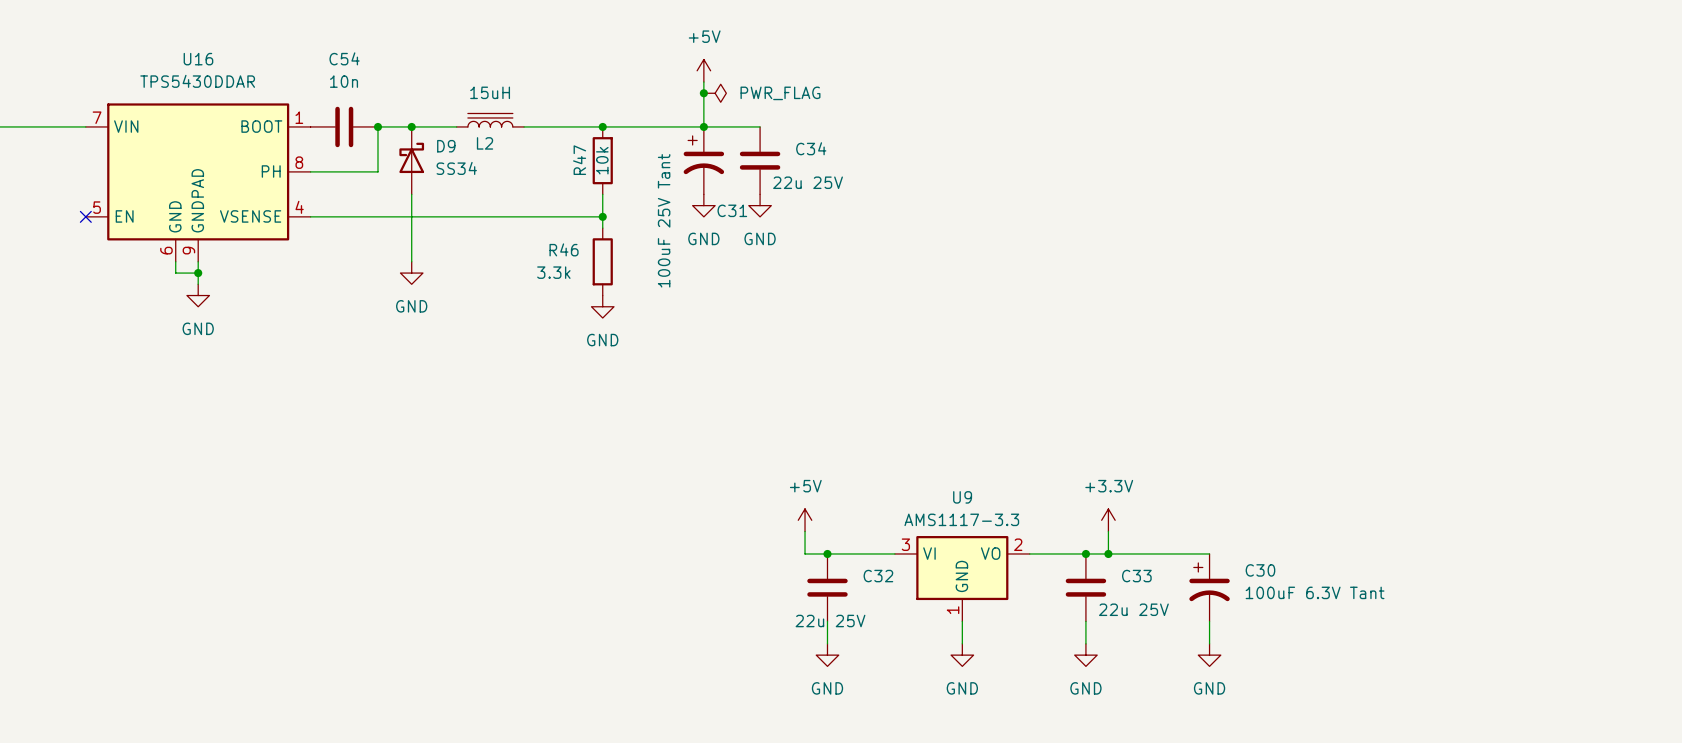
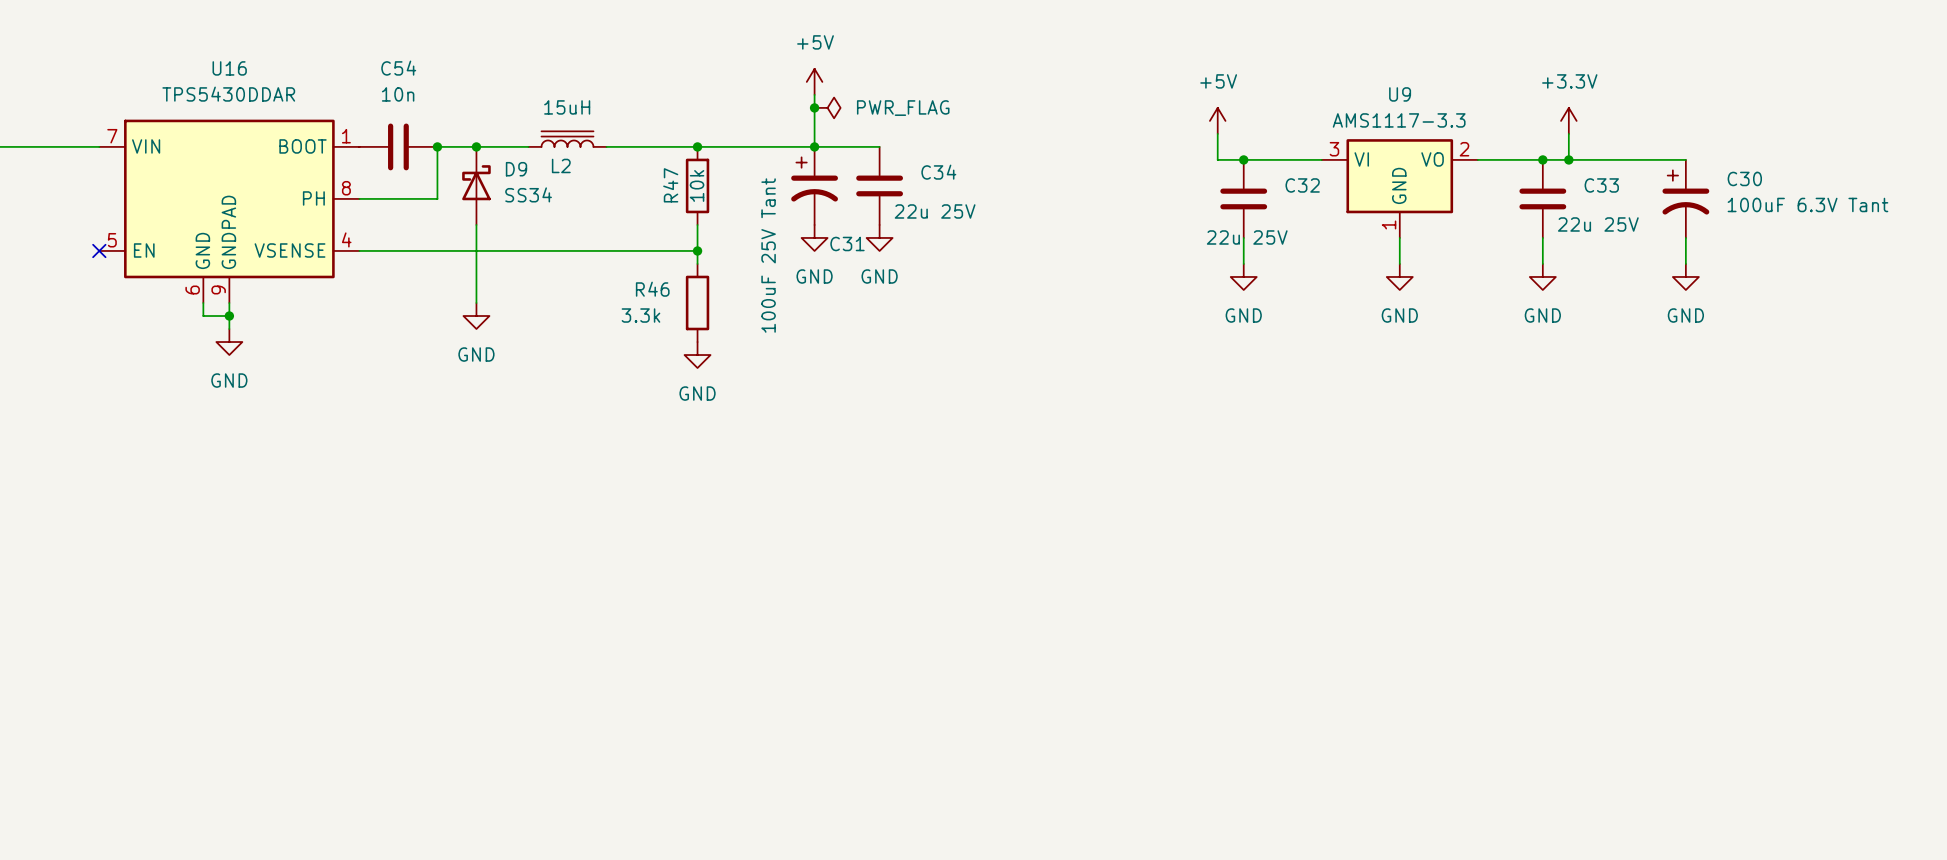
power symbol: none -> +5V (1217, 120)
power symbol: none -> +3.3V (1568, 120)
wire: none -> (1217, 133) (1217, 159) (1321, 159)
wire: none -> (1568, 133) (1568, 159)
junction: none -> (1243, 159)
wire: none -> (1477, 159) (1685, 159)
junction: none -> (1542, 159)
junction: none -> (1568, 159)
wire: none -> (1243, 237) (1243, 263)
wire: none -> (1399, 237) (1399, 263)
wire: none -> (1542, 237) (1542, 263)
wire: none -> (1685, 237) (1685, 263)
power symbol: none -> GND (1243, 276)
power symbol: none -> GND (1399, 276)
power symbol: none -> GND (1542, 276)
power symbol: none -> GND (1685, 276)
power symbol: +5V (805, 520) -> none
power symbol: +3.3V (1108, 520) -> none
wire: (805, 531) (805, 553) (894, 553) -> none
wire: (1108, 531) (1108, 553) -> none
junction: (827, 553) -> none
wire: (1029, 553) (1209, 553) -> none
junction: (1085, 553) -> none
junction: (1108, 553) -> none
U9 position: (962, 578) -> (1399, 188)
C32 position: (827, 587) -> (1243, 198)
C33 position: (1085, 587) -> (1542, 198)
C30 position: (1209, 587) -> (1685, 198)
wire: (827, 621) (827, 643) -> none
wire: (962, 621) (962, 643) -> none
wire: (1085, 621) (1085, 643) -> none
wire: (1209, 621) (1209, 643) -> none
power symbol: GND (827, 655) -> none
power symbol: GND (962, 655) -> none
power symbol: GND (1085, 655) -> none
power symbol: GND (1209, 655) -> none

